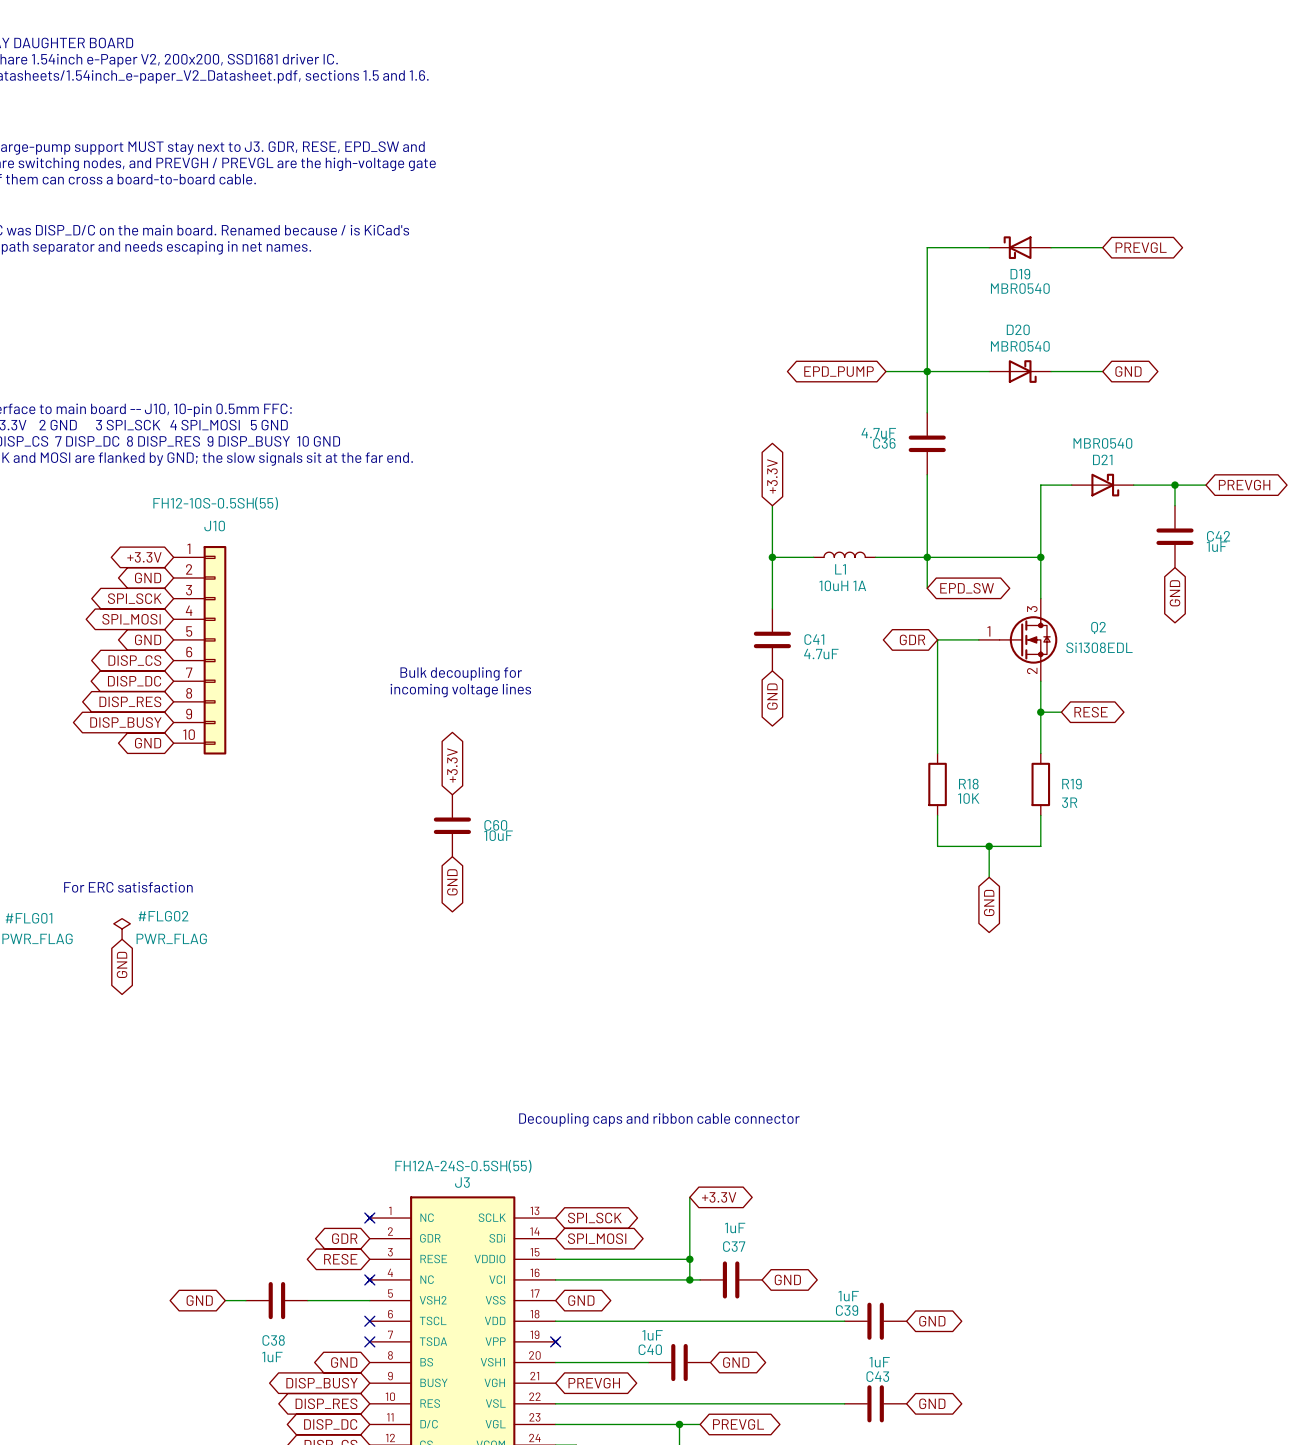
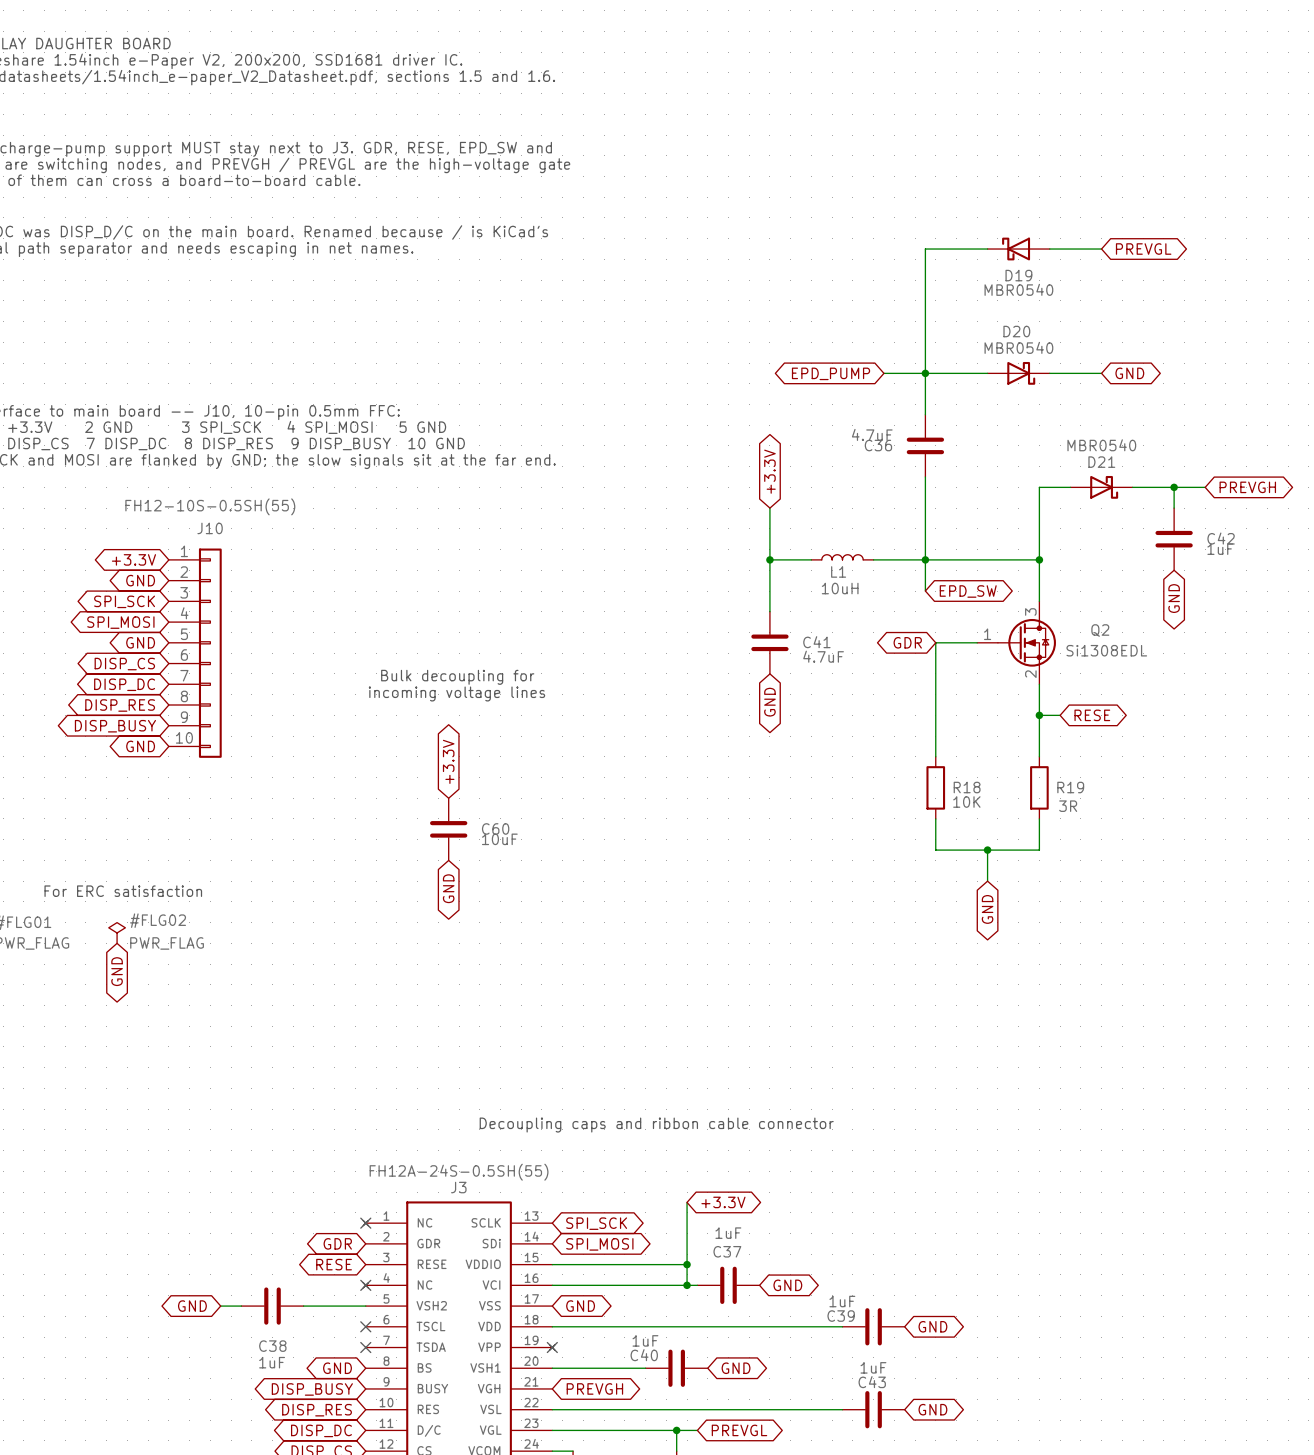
L1 value: 10uH 1A (842, 585) -> 10uH (840, 588)

